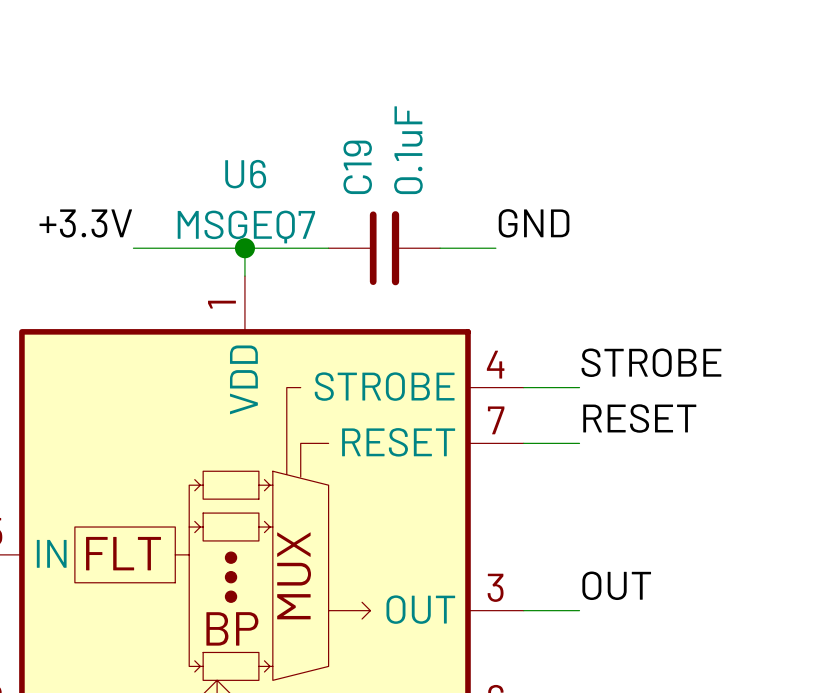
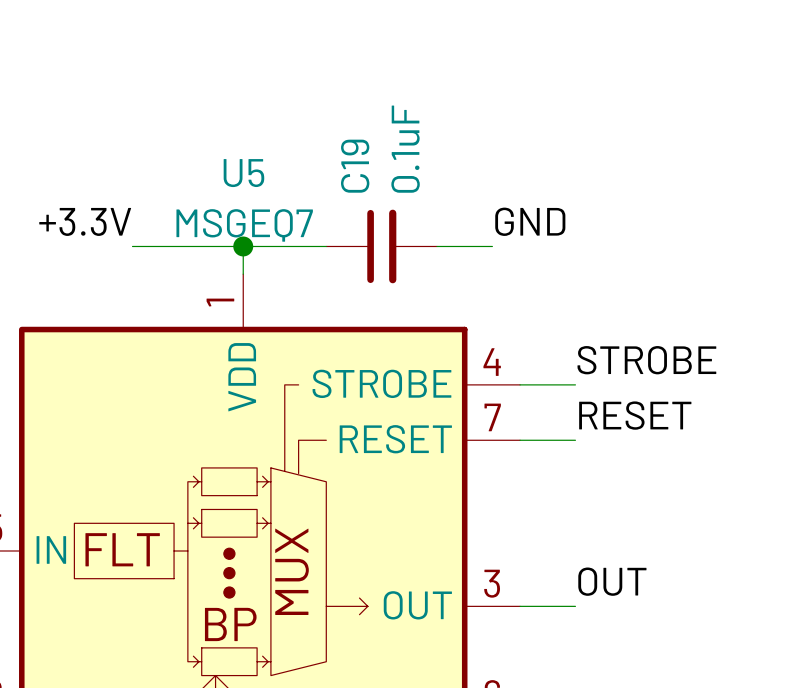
U6 name: U6 (245, 174) -> U5 (243, 173)

